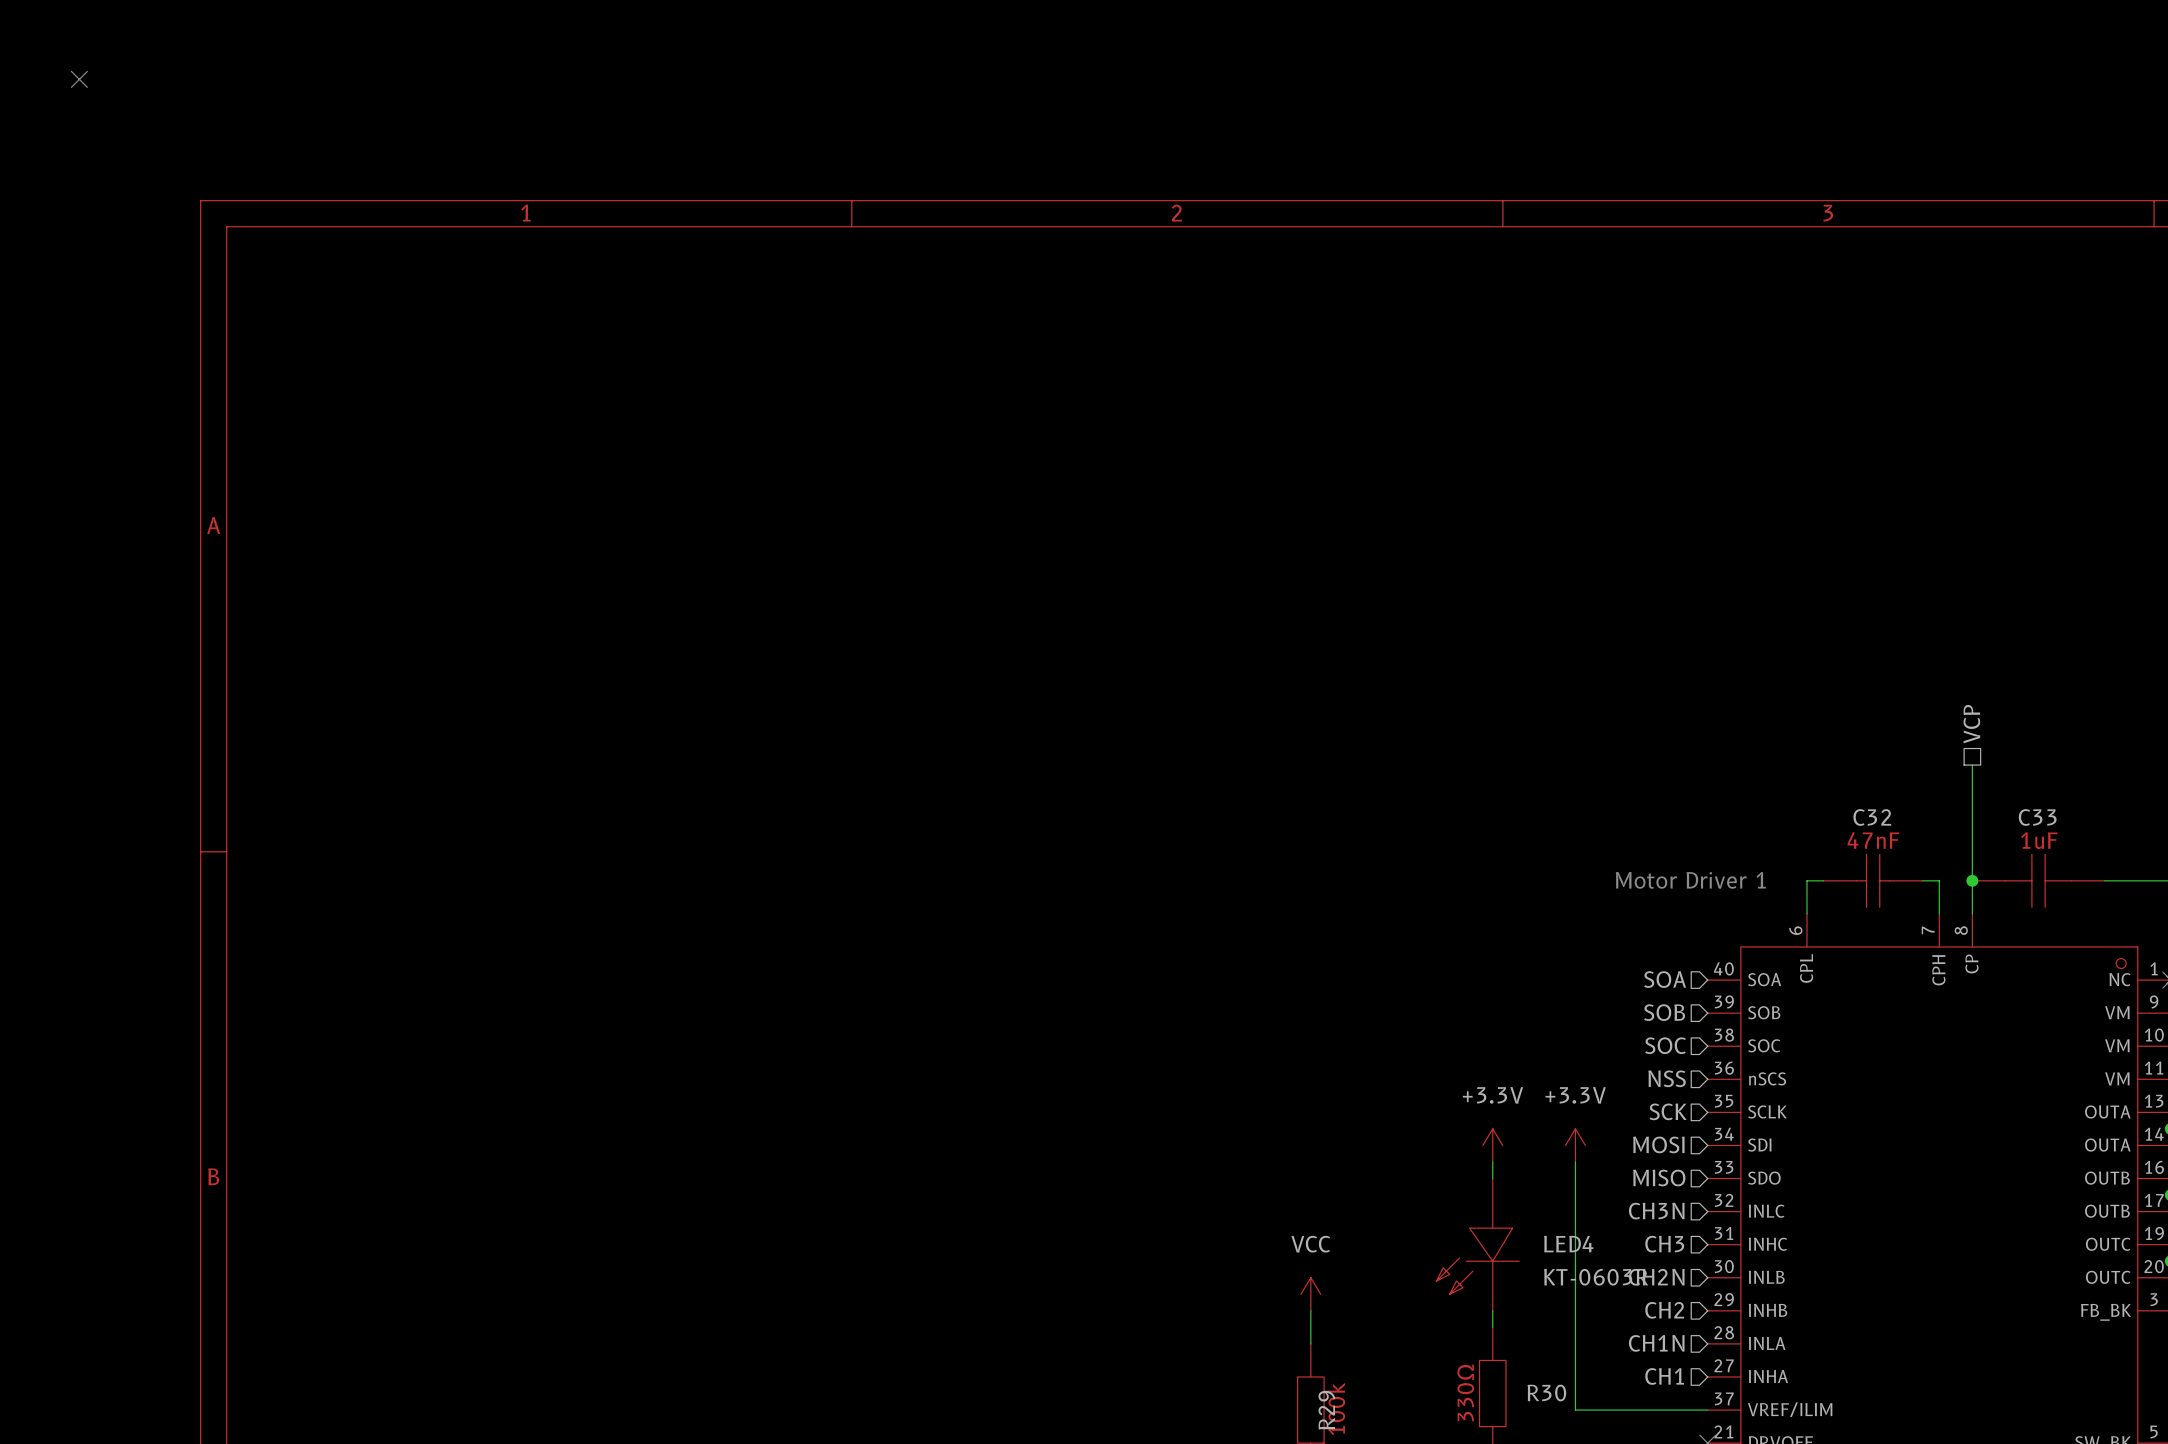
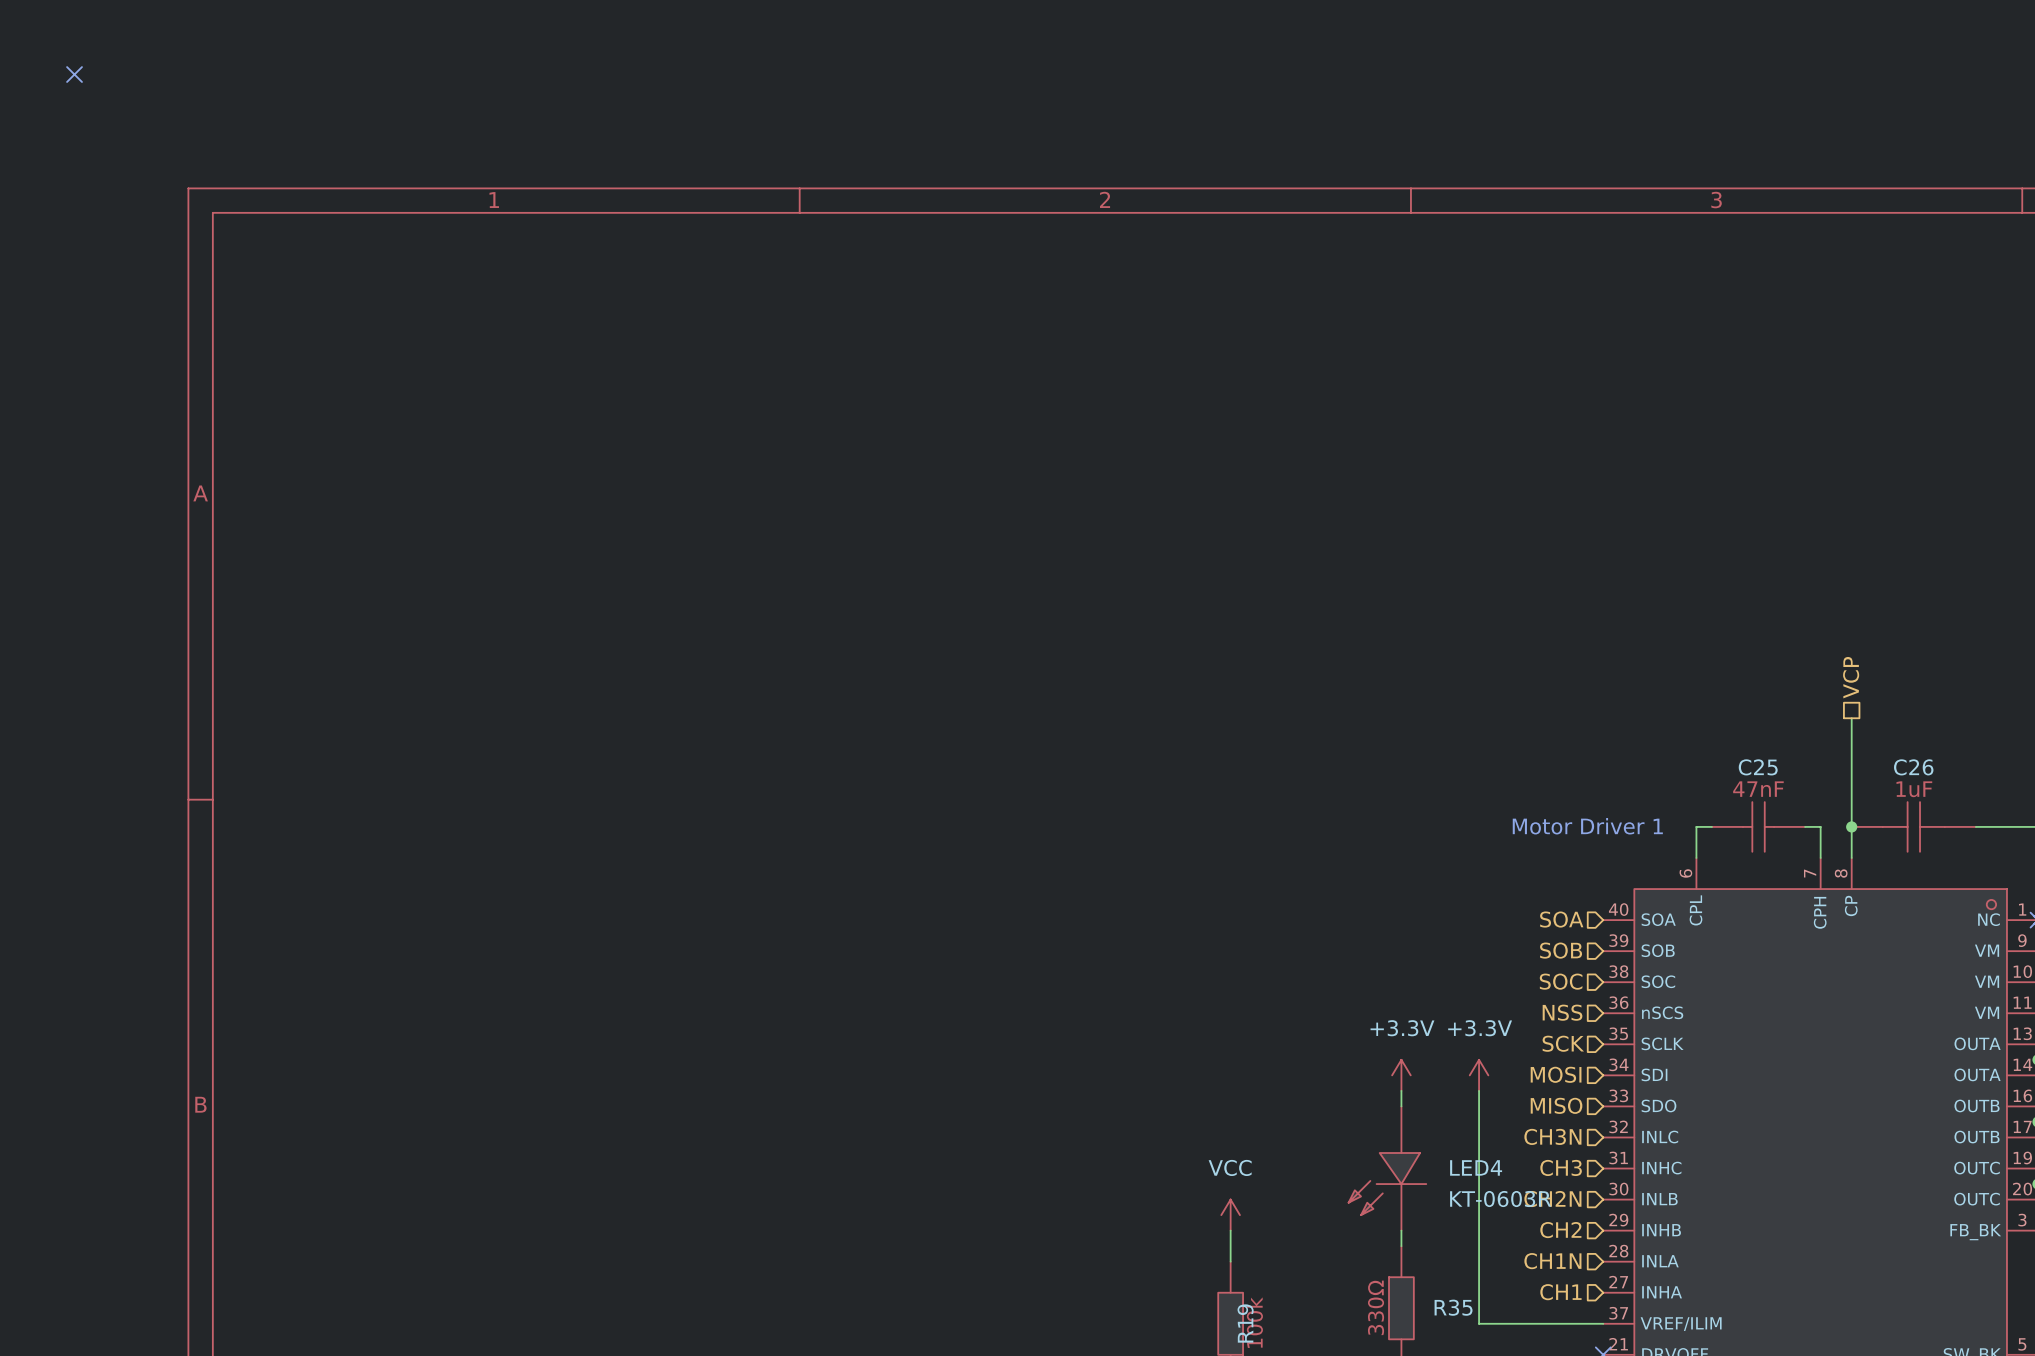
C32 name: C32 (1872, 817) -> C25 (1758, 767)
C33 name: C33 (2037, 817) -> C26 (1913, 767)
R30 name: R30 (1546, 1393) -> R35 (1453, 1307)
R29 name: R29 (1326, 1410) -> R19 (1245, 1323)

